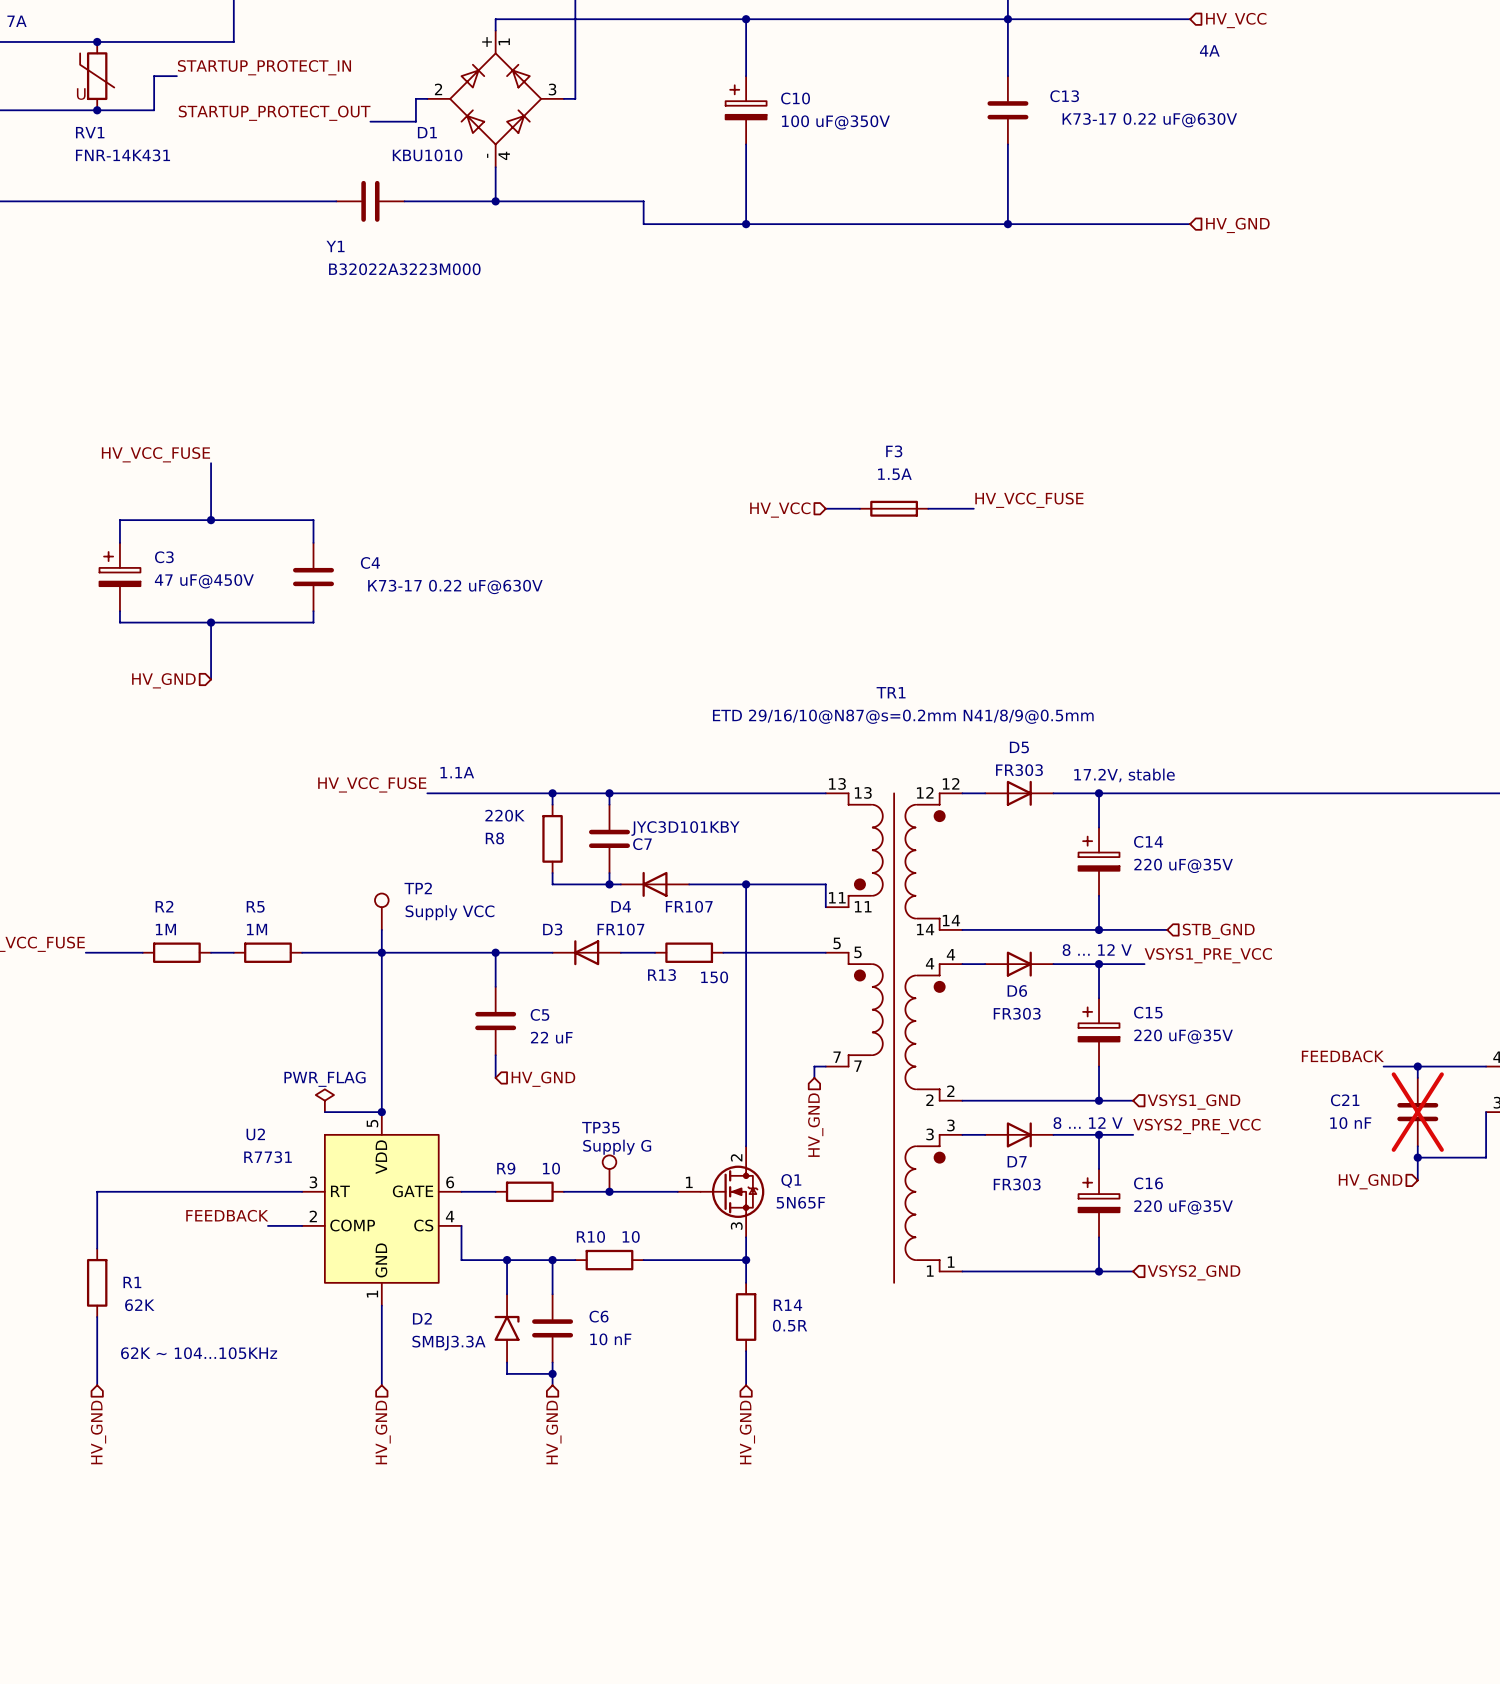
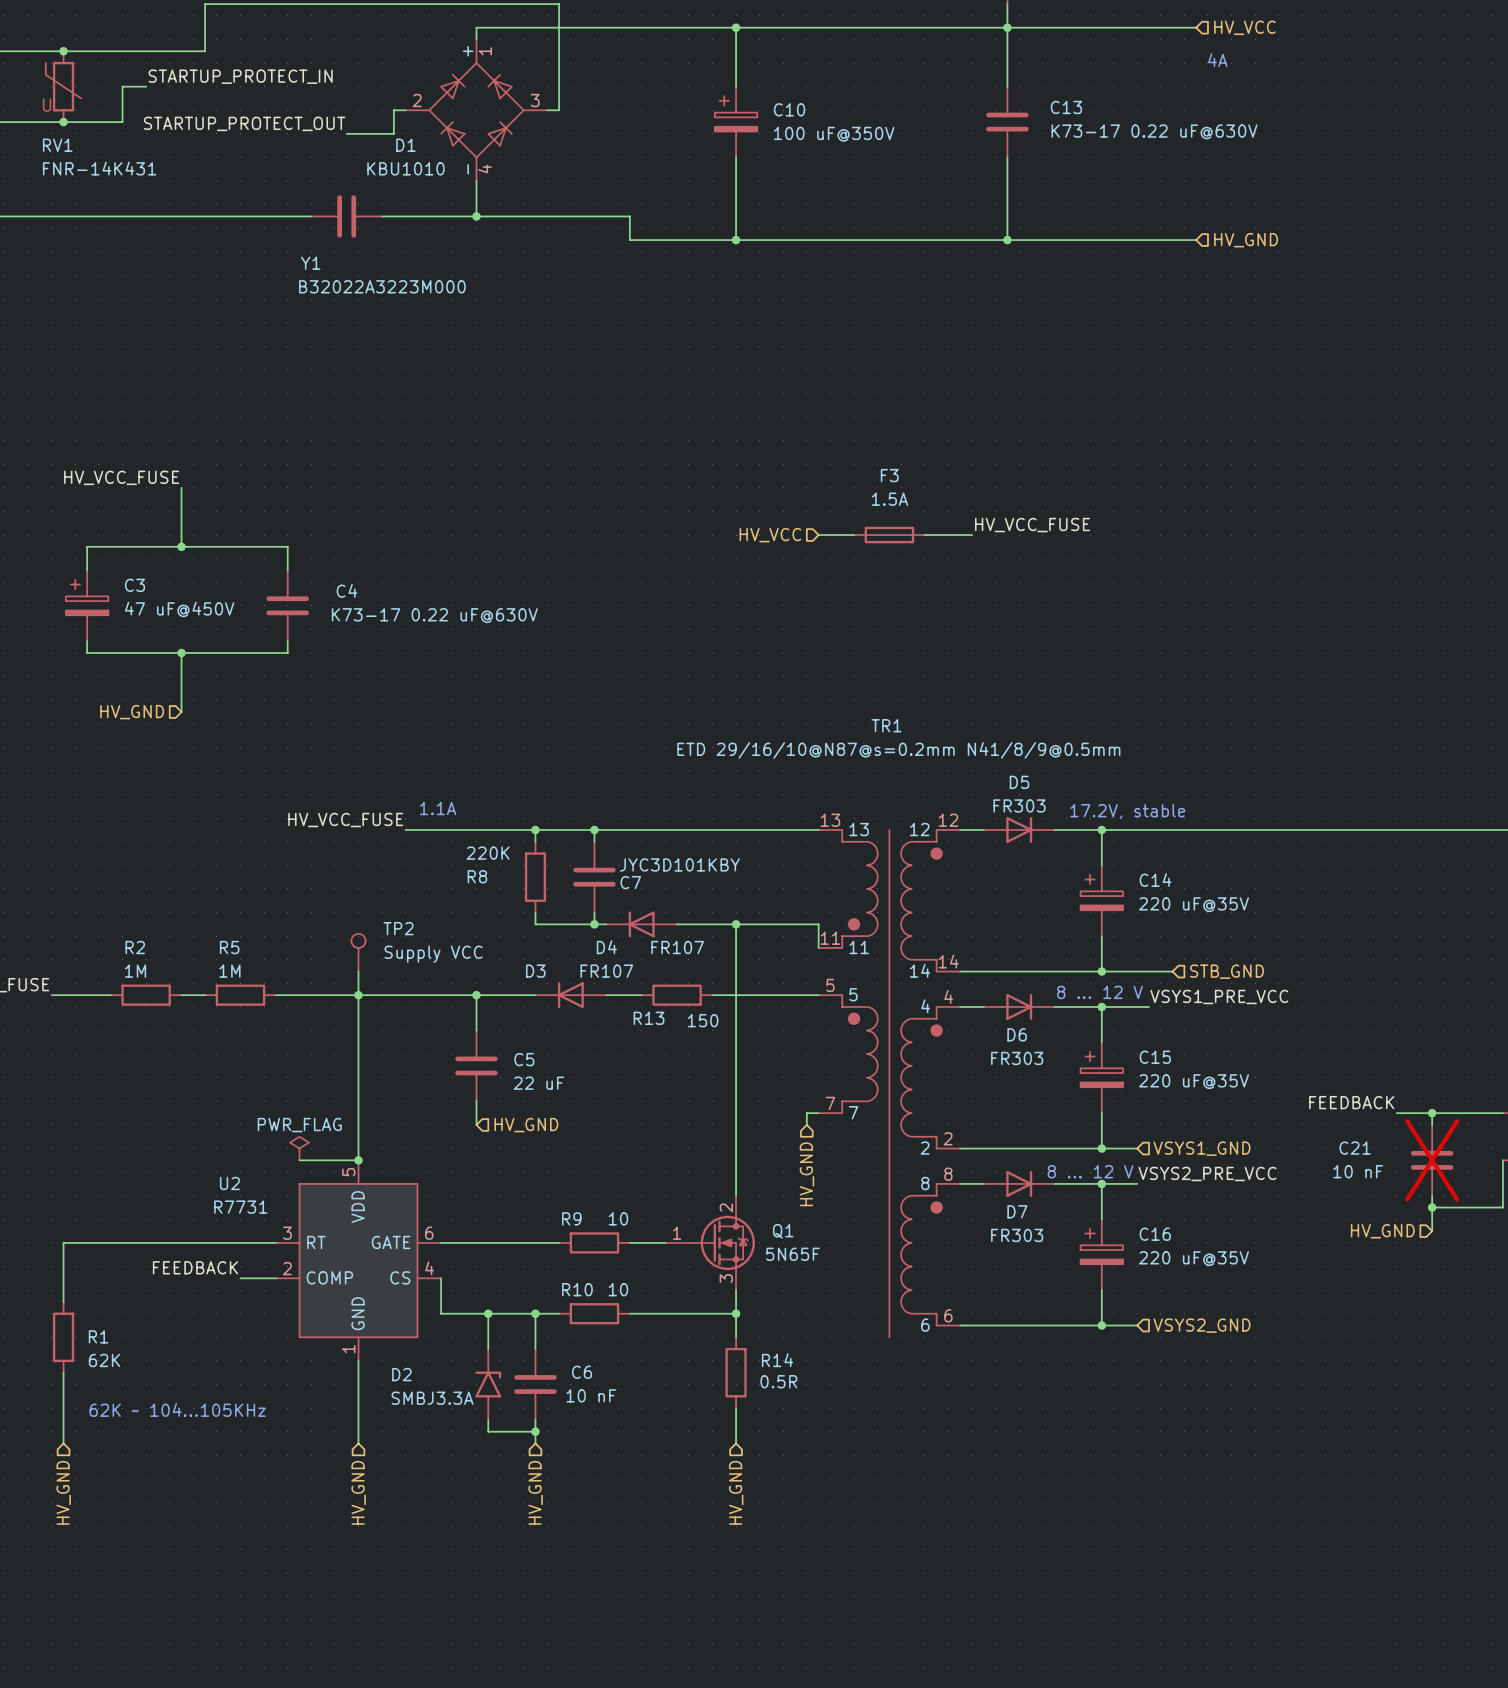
TR1 pin number: 3 (950, 1125) -> 8 (948, 1174)
TR1 pin name: 3 (930, 1134) -> 8 (925, 1183)
TP35: Supply G (609, 1173) -> none
R9 position: (529, 1191) -> (594, 1242)
wire: (575, 1191) (643, 1191) -> (476, 1242) (547, 1242)
junction: (609, 1191) -> none
TR1 pin number: 1 (951, 1262) -> 6 (948, 1315)
TR1 pin name: 1 (930, 1271) -> 6 (925, 1325)

